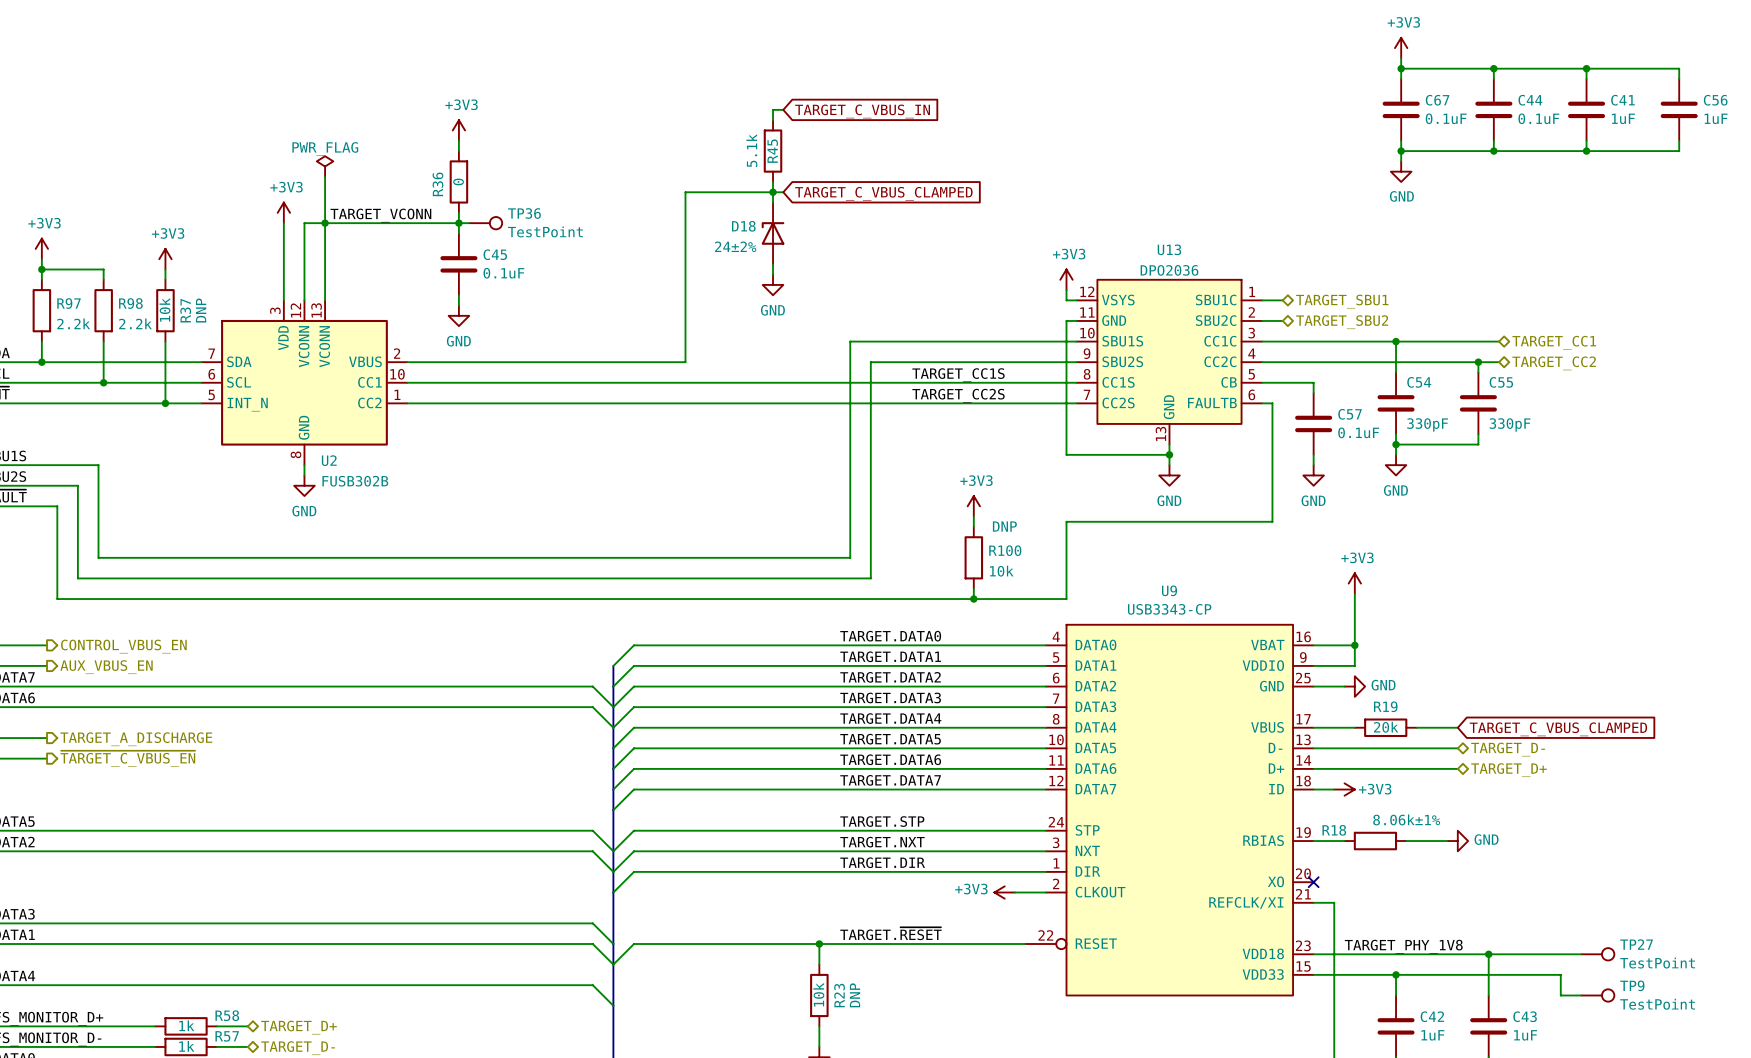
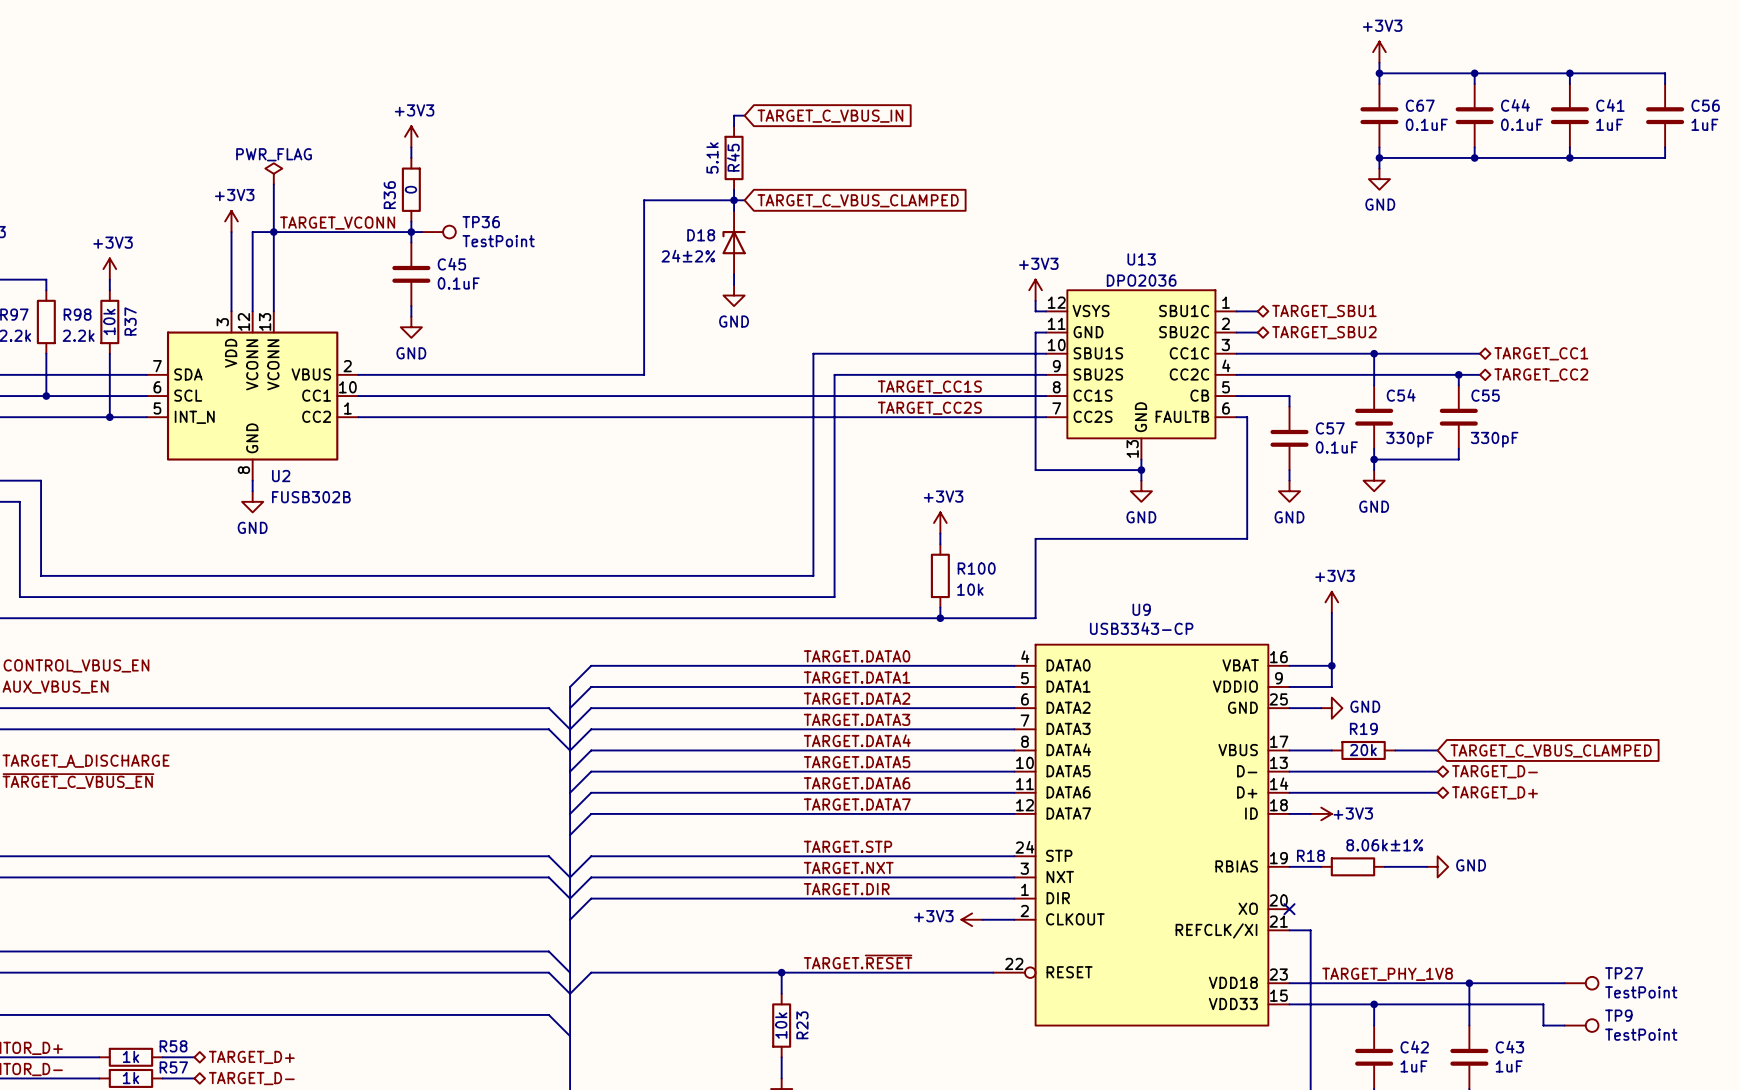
R37 text: DNP (201, 310) -> none
R100 text: DNP (1004, 526) -> none
R23 text: DNP (855, 995) -> none

